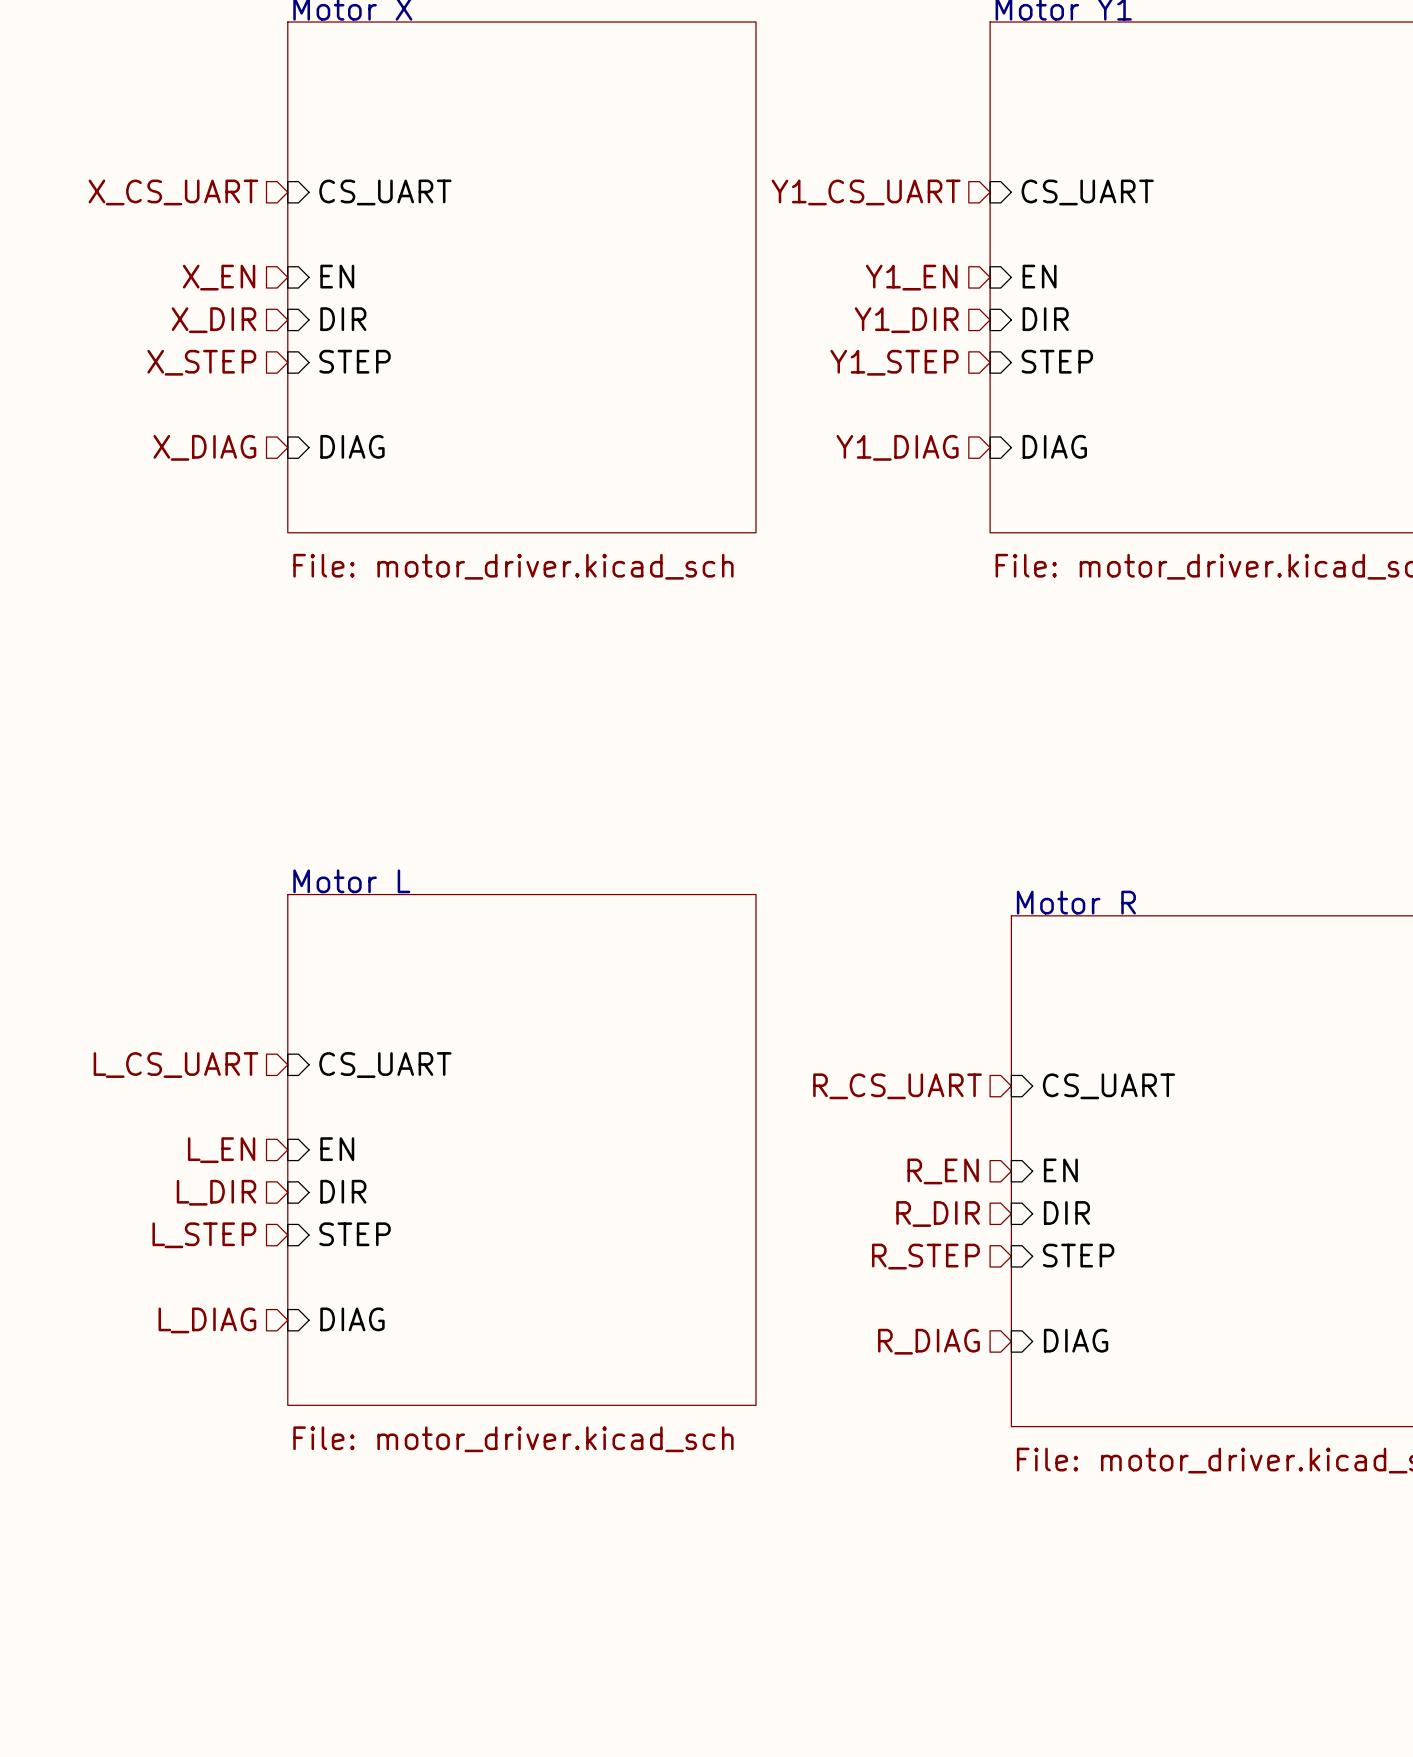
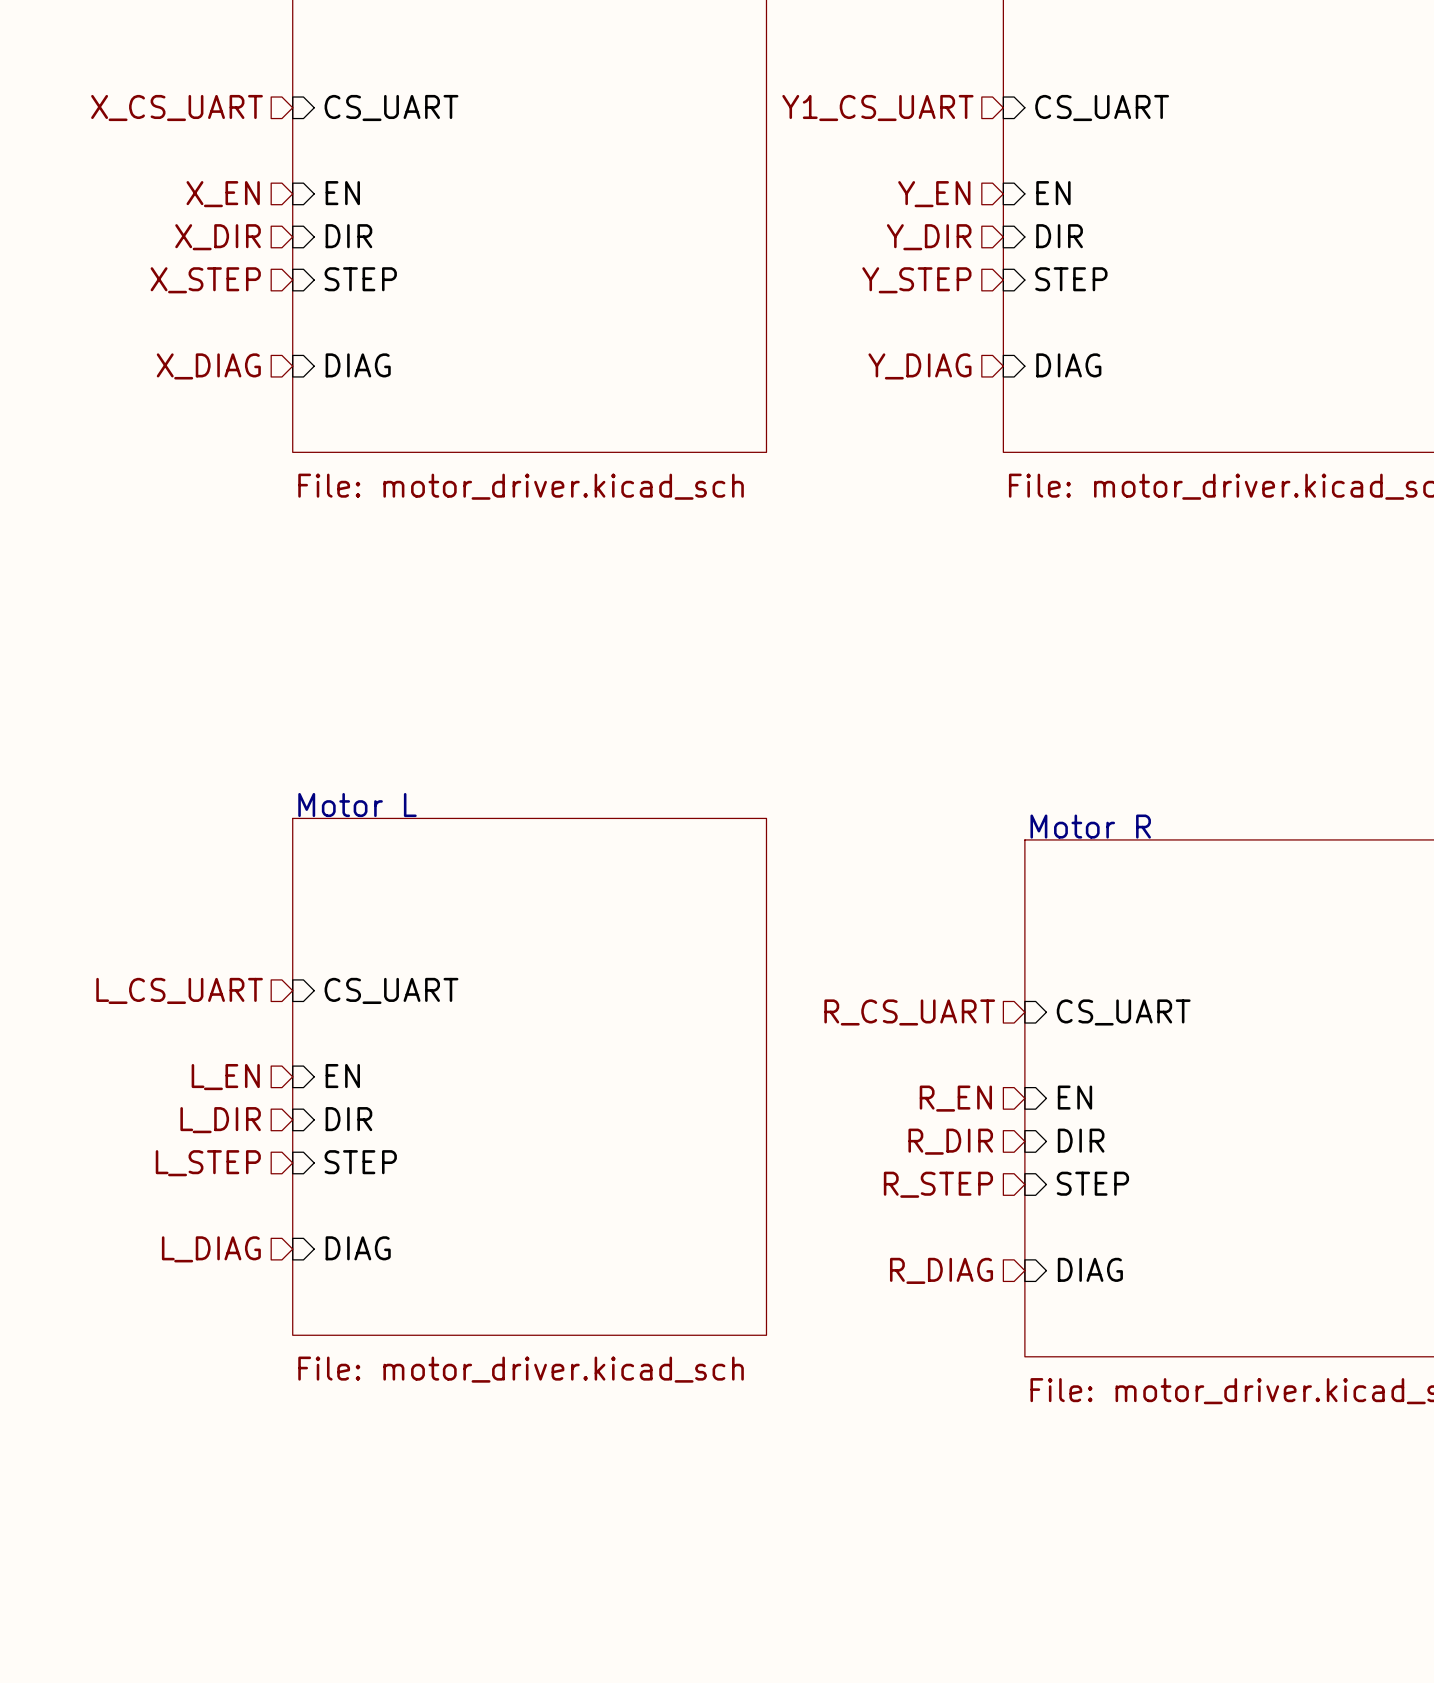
hierarchical label: Y1_EN (911, 277) -> Y_EN (934, 194)
hierarchical label: Y1_DIR (906, 320) -> Y_DIR (929, 237)
hierarchical label: Y1_STEP (894, 362) -> Y_STEP (916, 280)
hierarchical label: Y1_DIAG (897, 447) -> Y_DIAG (919, 366)

